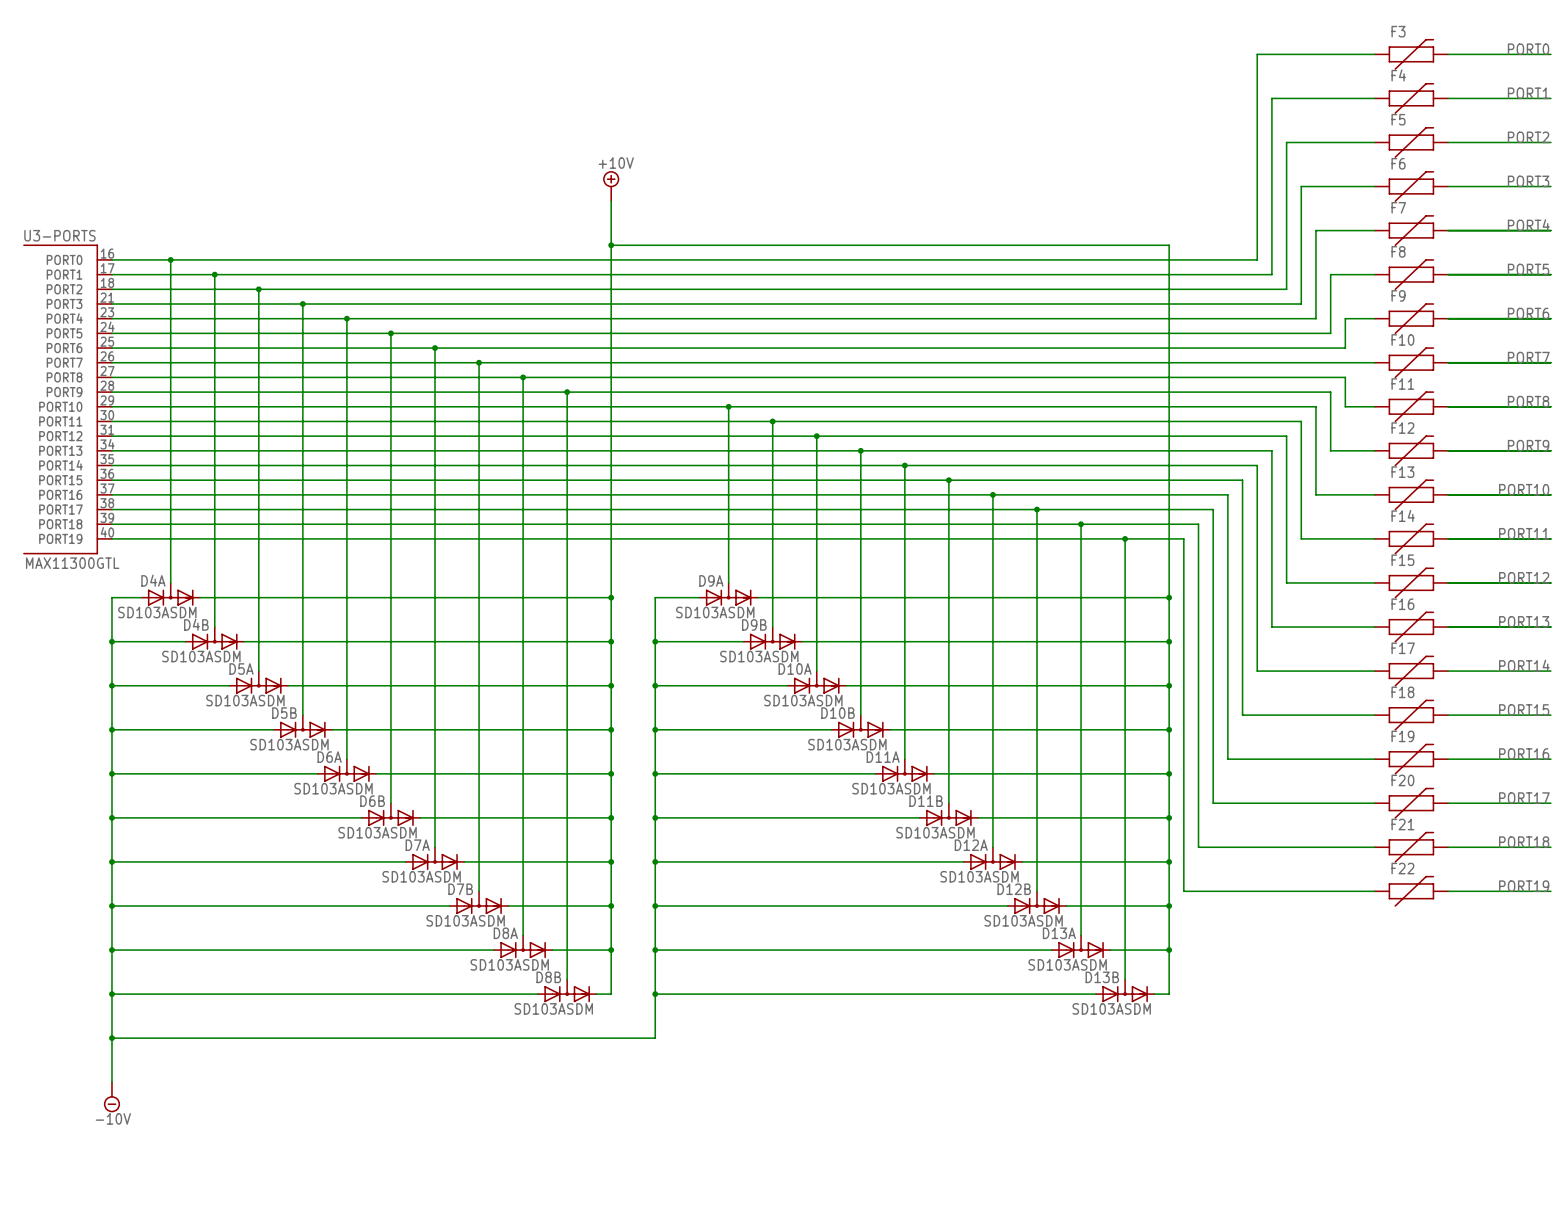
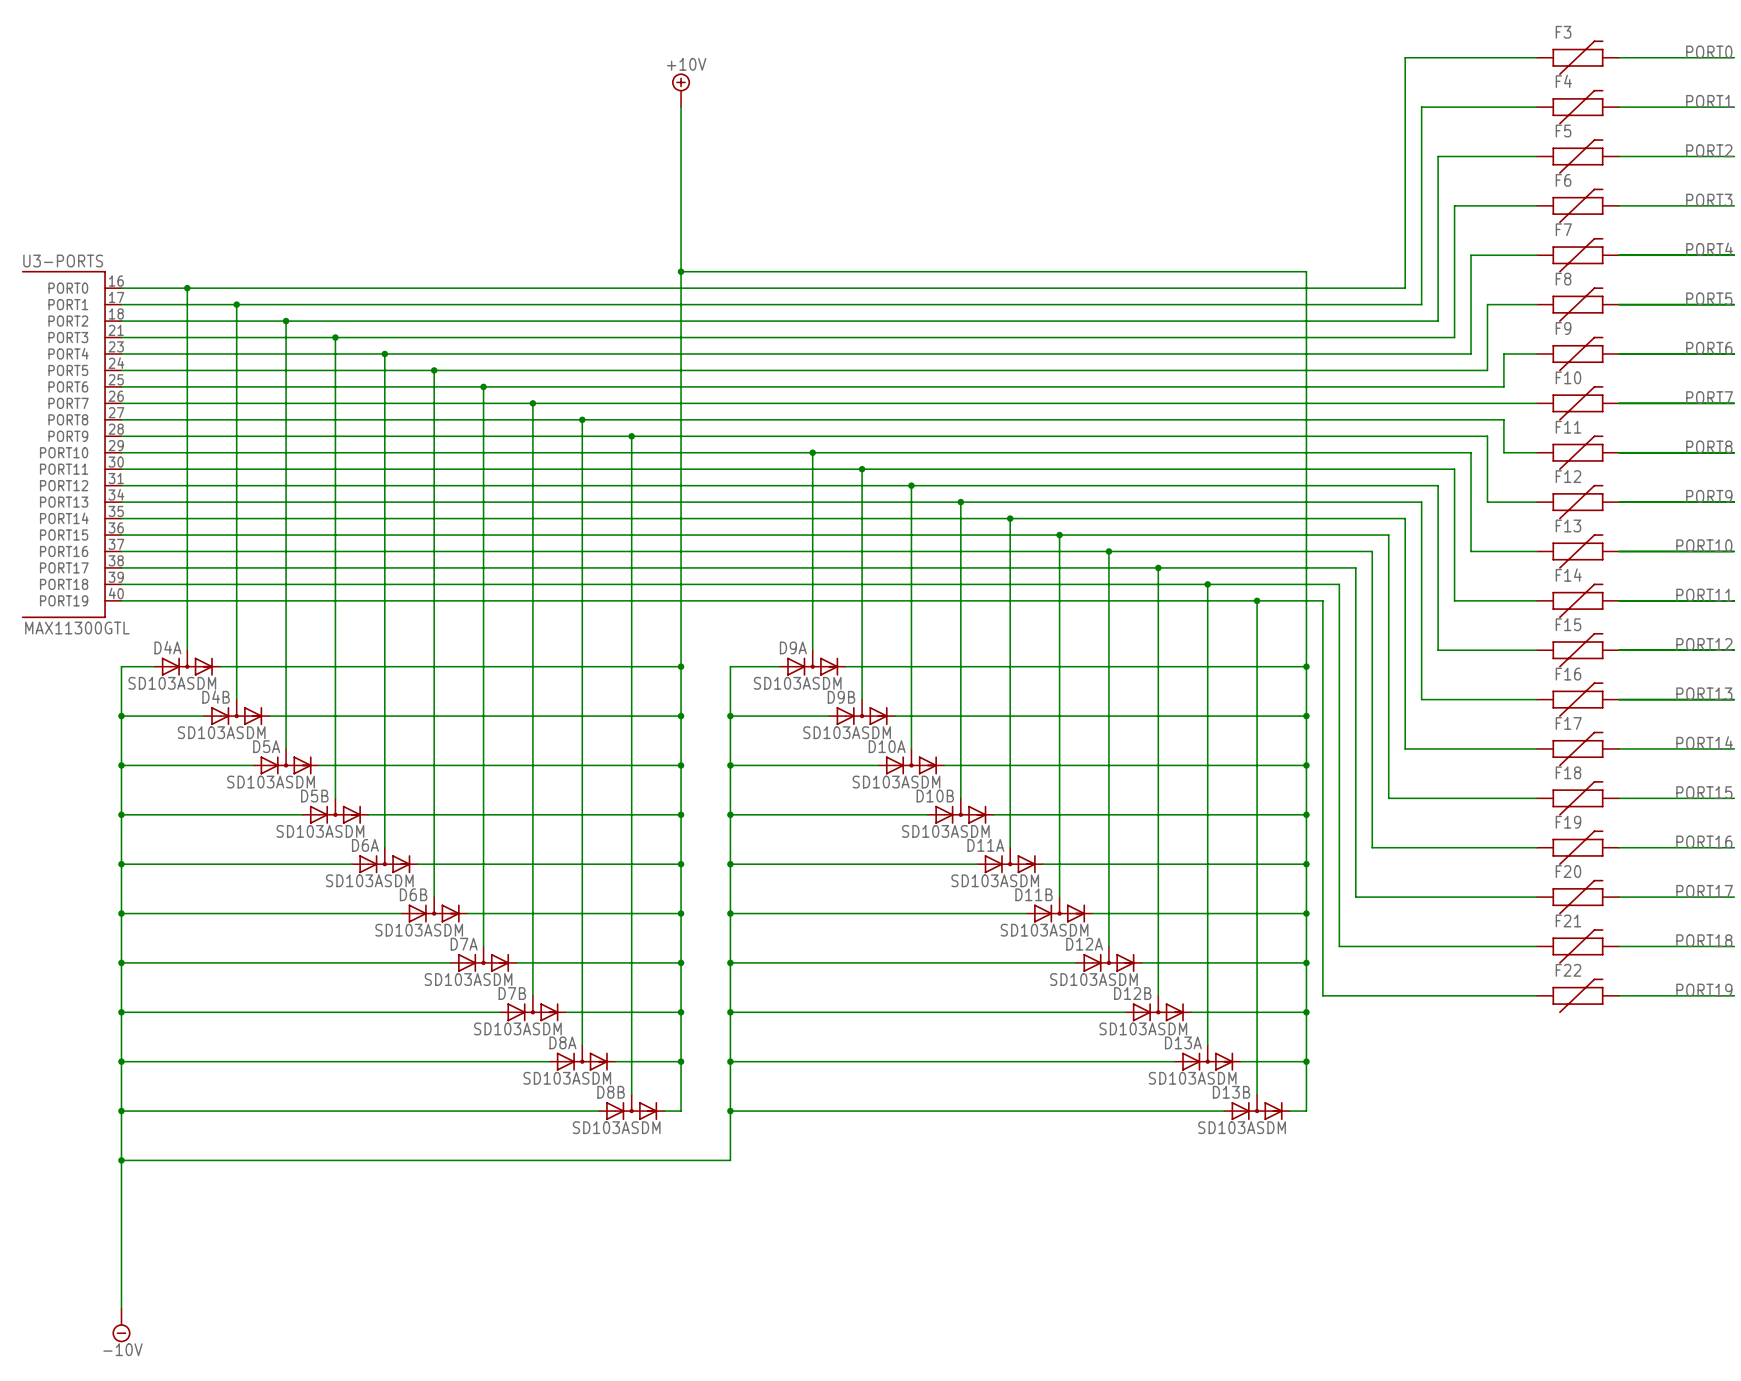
wire: none -> (681, 107) (681, 222)
power symbol position: +10V (611, 186) -> +10V (681, 90)
wire: none -> (121, 1209) (121, 1308)
power symbol position: -10V (111, 1097) -> -10V (121, 1325)

